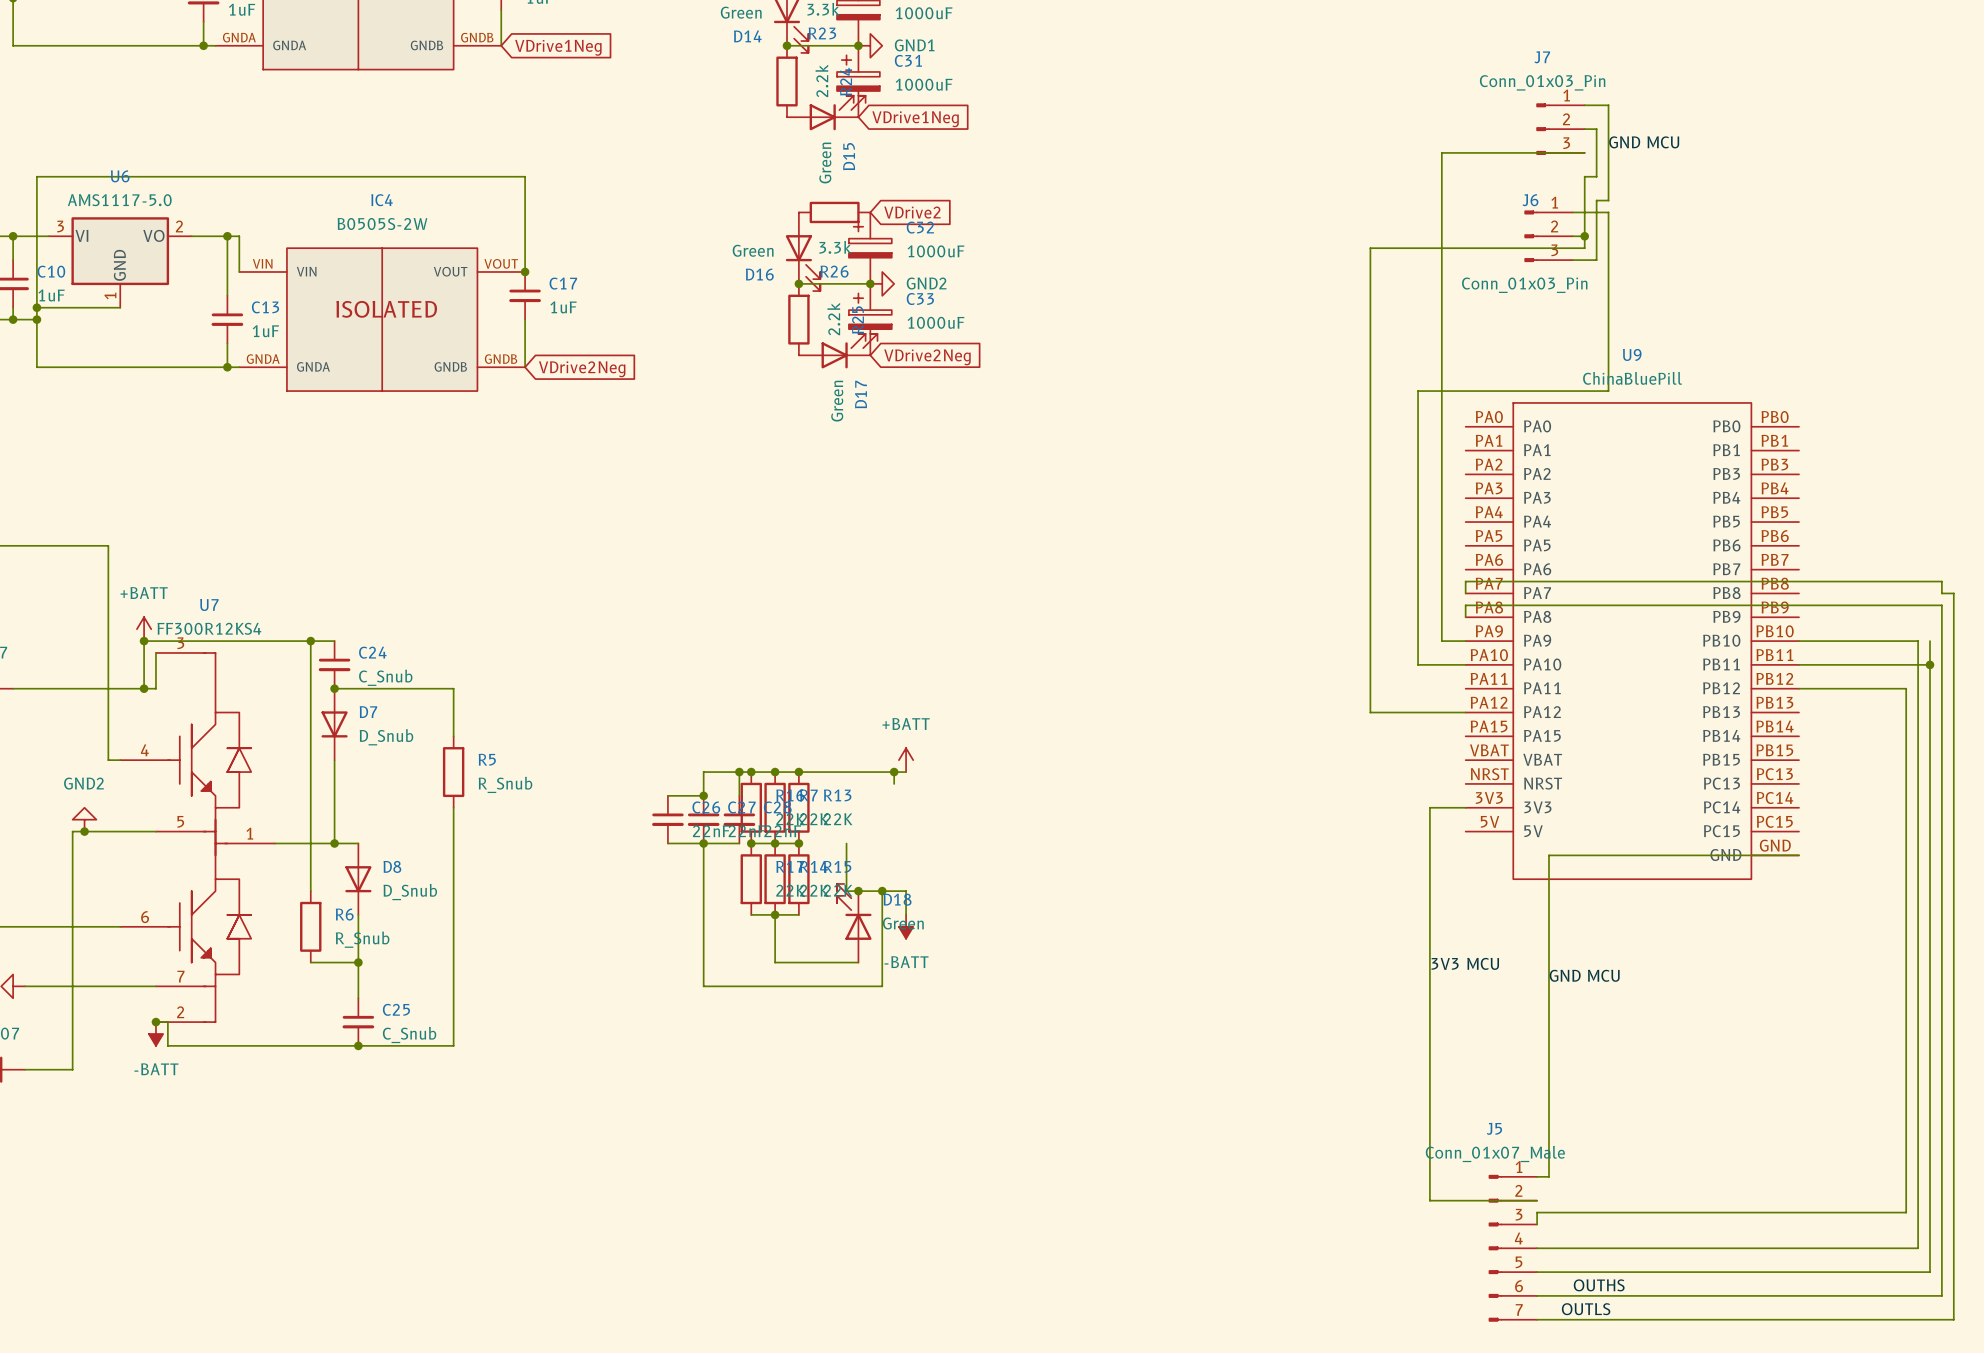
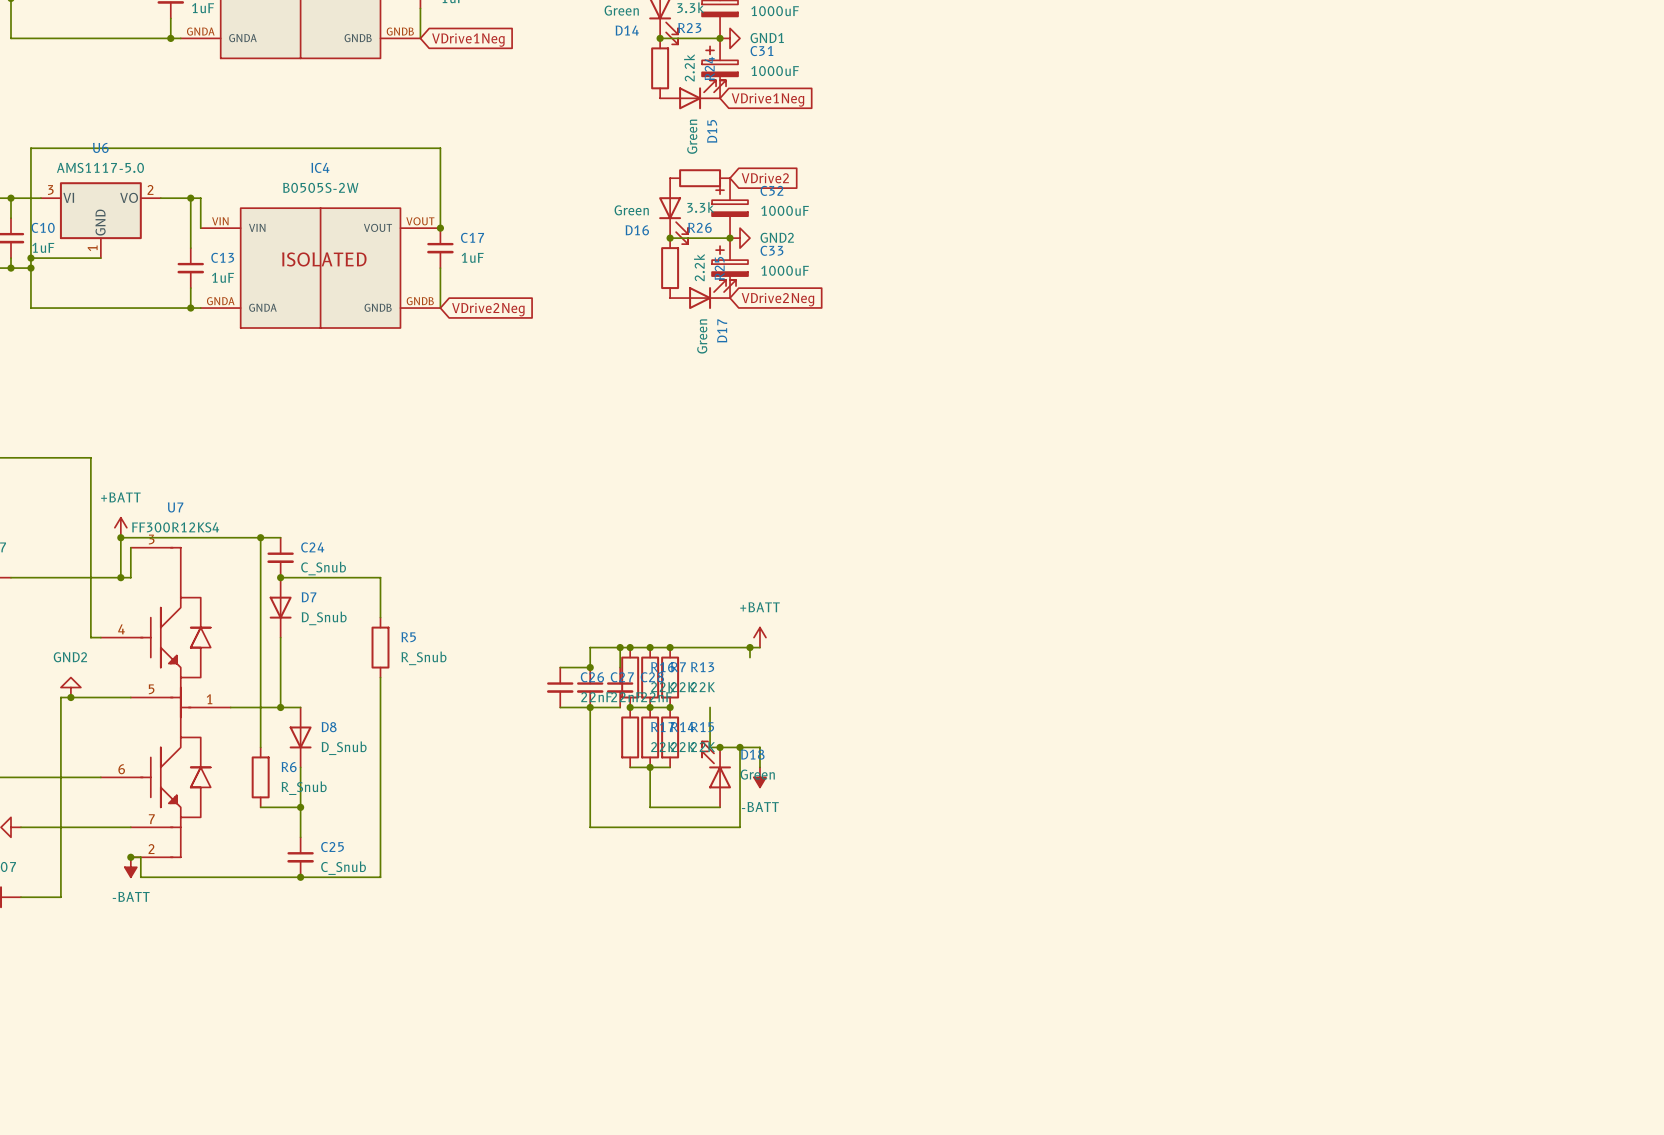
wire: (1584, 105) (1608, 105) (1608, 200) (1596, 200) (1596, 260) (1572, 260) -> none
J7: Conn_01x03_Pin (1560, 129) -> none
wire: (1584, 129) (1596, 129) (1596, 176) (1584, 176) (1584, 248) (1370, 248) (1370, 712) (1465, 712) -> none
label: GND MCU (1644, 142) -> none
wire: (1584, 152) (1441, 152) (1441, 641) (1465, 641) -> none
wire: (1572, 212) (1608, 212) (1608, 391) (1418, 391) (1418, 664) (1465, 664) -> none
J6: Conn_01x03_Pin (1548, 236) -> none
wire: (1572, 236) (1584, 236) -> none
junction: (1584, 236) -> none
wire: (1465, 593) (1465, 581) (1941, 581) (1941, 593) (1953, 593) (1953, 1319) (1537, 1319) -> none
wire: (1465, 617) (1465, 605) (1941, 605) (1941, 1295) (1537, 1295) -> none
U9: ChinaBluePill (1632, 641) -> none
wire: (1799, 641) (1918, 641) (1918, 1248) (1537, 1248) -> none
wire: (1929, 641) (1929, 1272) (1537, 1272) -> none
wire: (1799, 664) (1929, 664) -> none
junction: (1929, 664) -> none
wire: (1799, 688) (1906, 688) (1906, 1212) (1537, 1212) (1537, 1224) -> none
wire: (1465, 807) (1429, 807) (1429, 1200) (1537, 1200) -> none
wire: (1799, 855) (1548, 855) (1548, 1176) (1537, 1176) -> none
label: 3V3 MCU (1465, 963) -> none
label: GND MCU (1584, 975) -> none
J5: Conn_01x07_Male (1512, 1248) -> none
label: OUTHS (1599, 1285) -> none
label: OUTLS (1586, 1309) -> none

